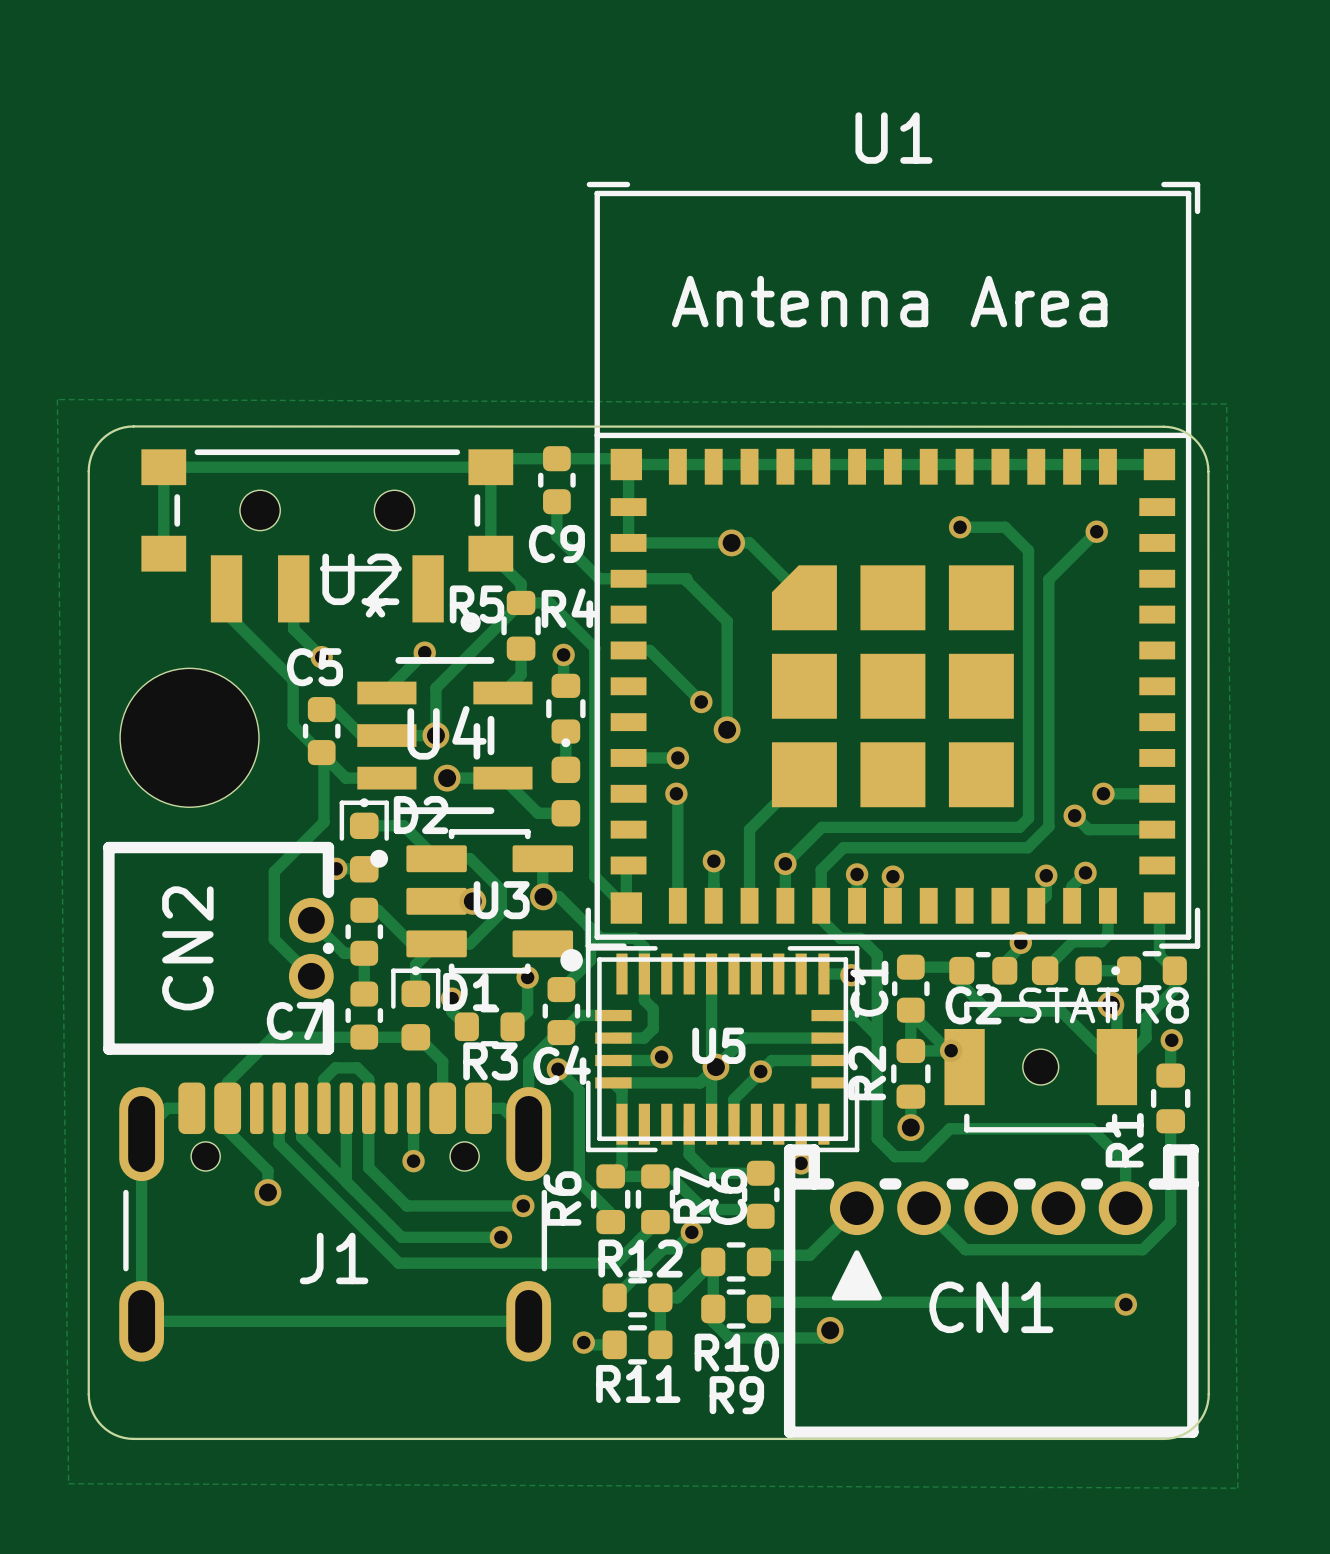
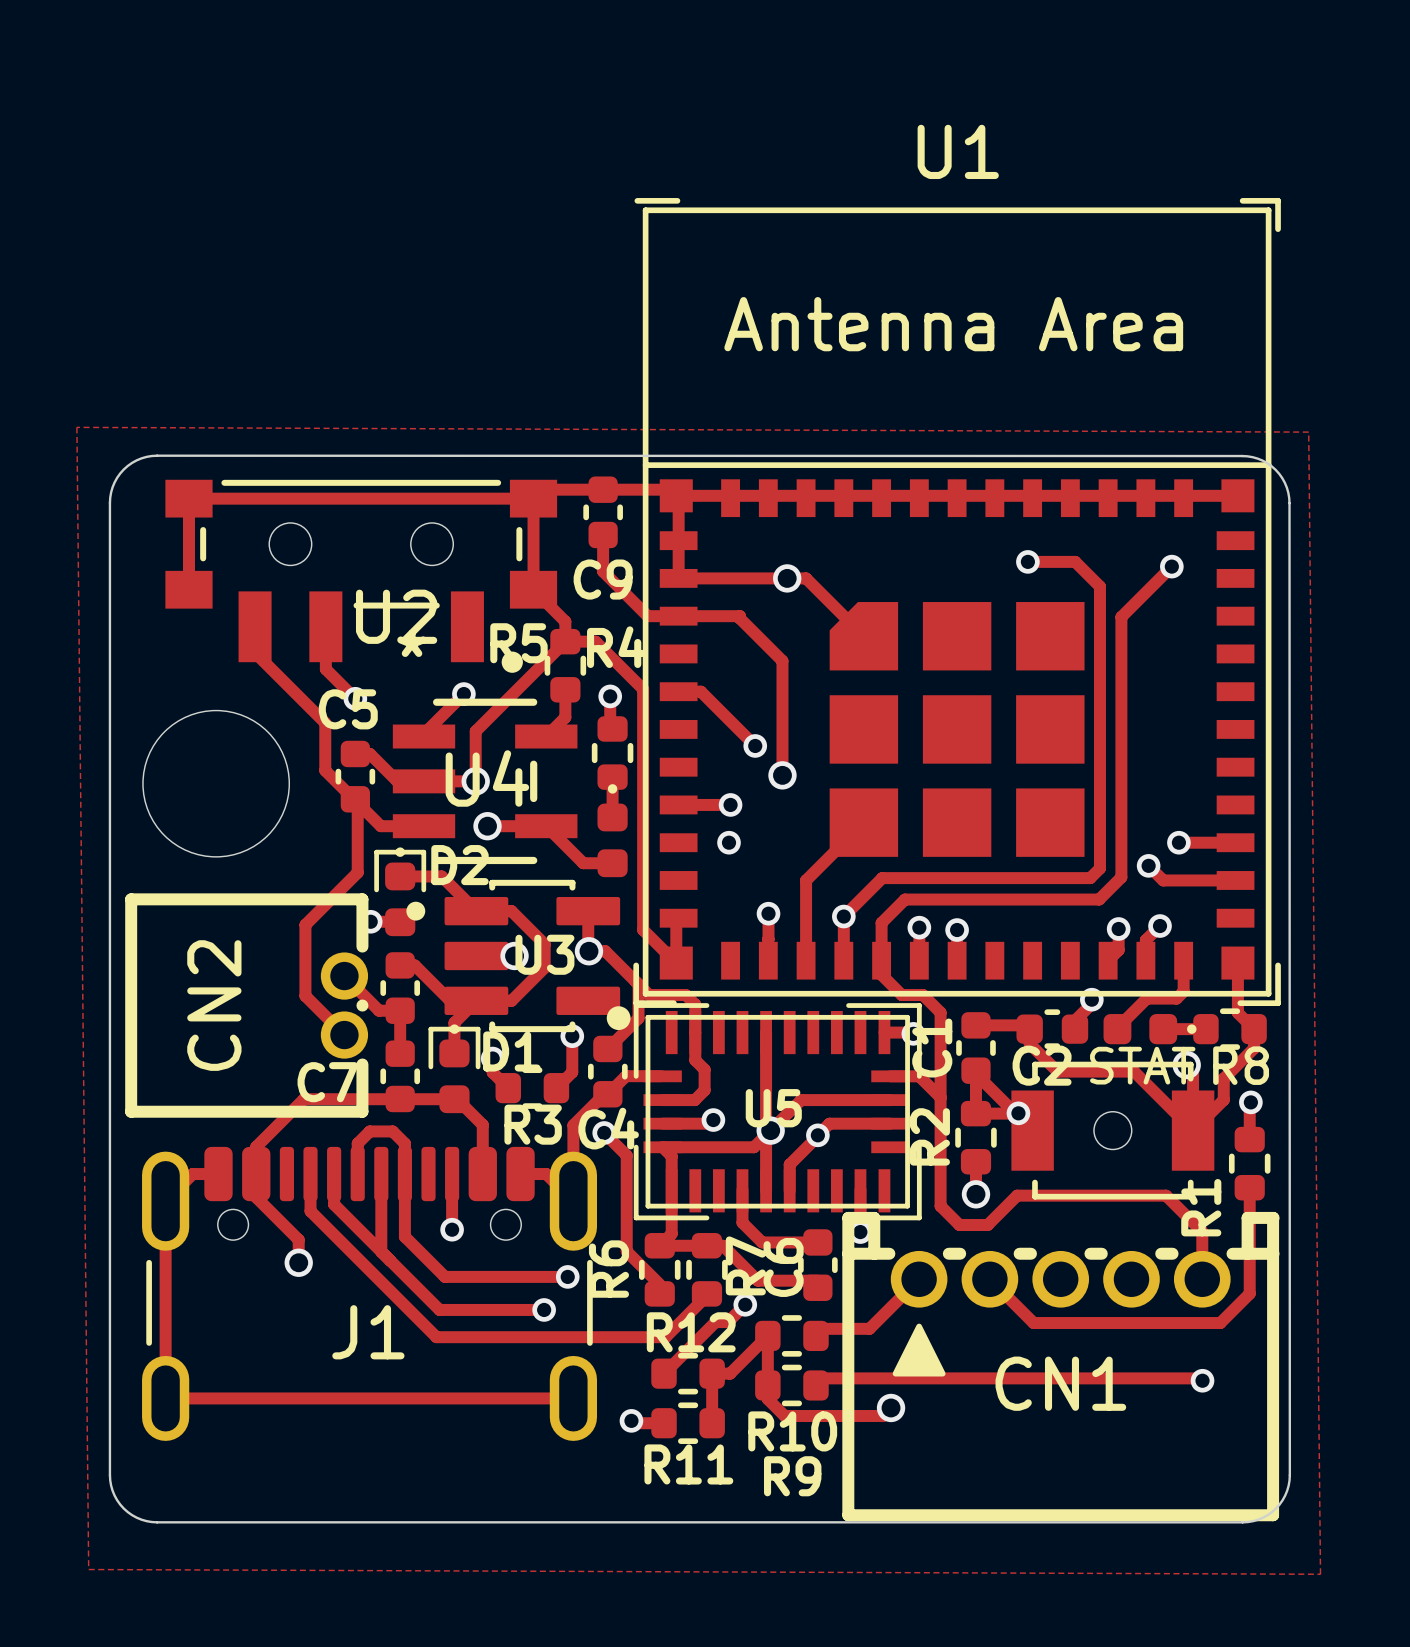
track: (677, 795) (677, 905) -> none

